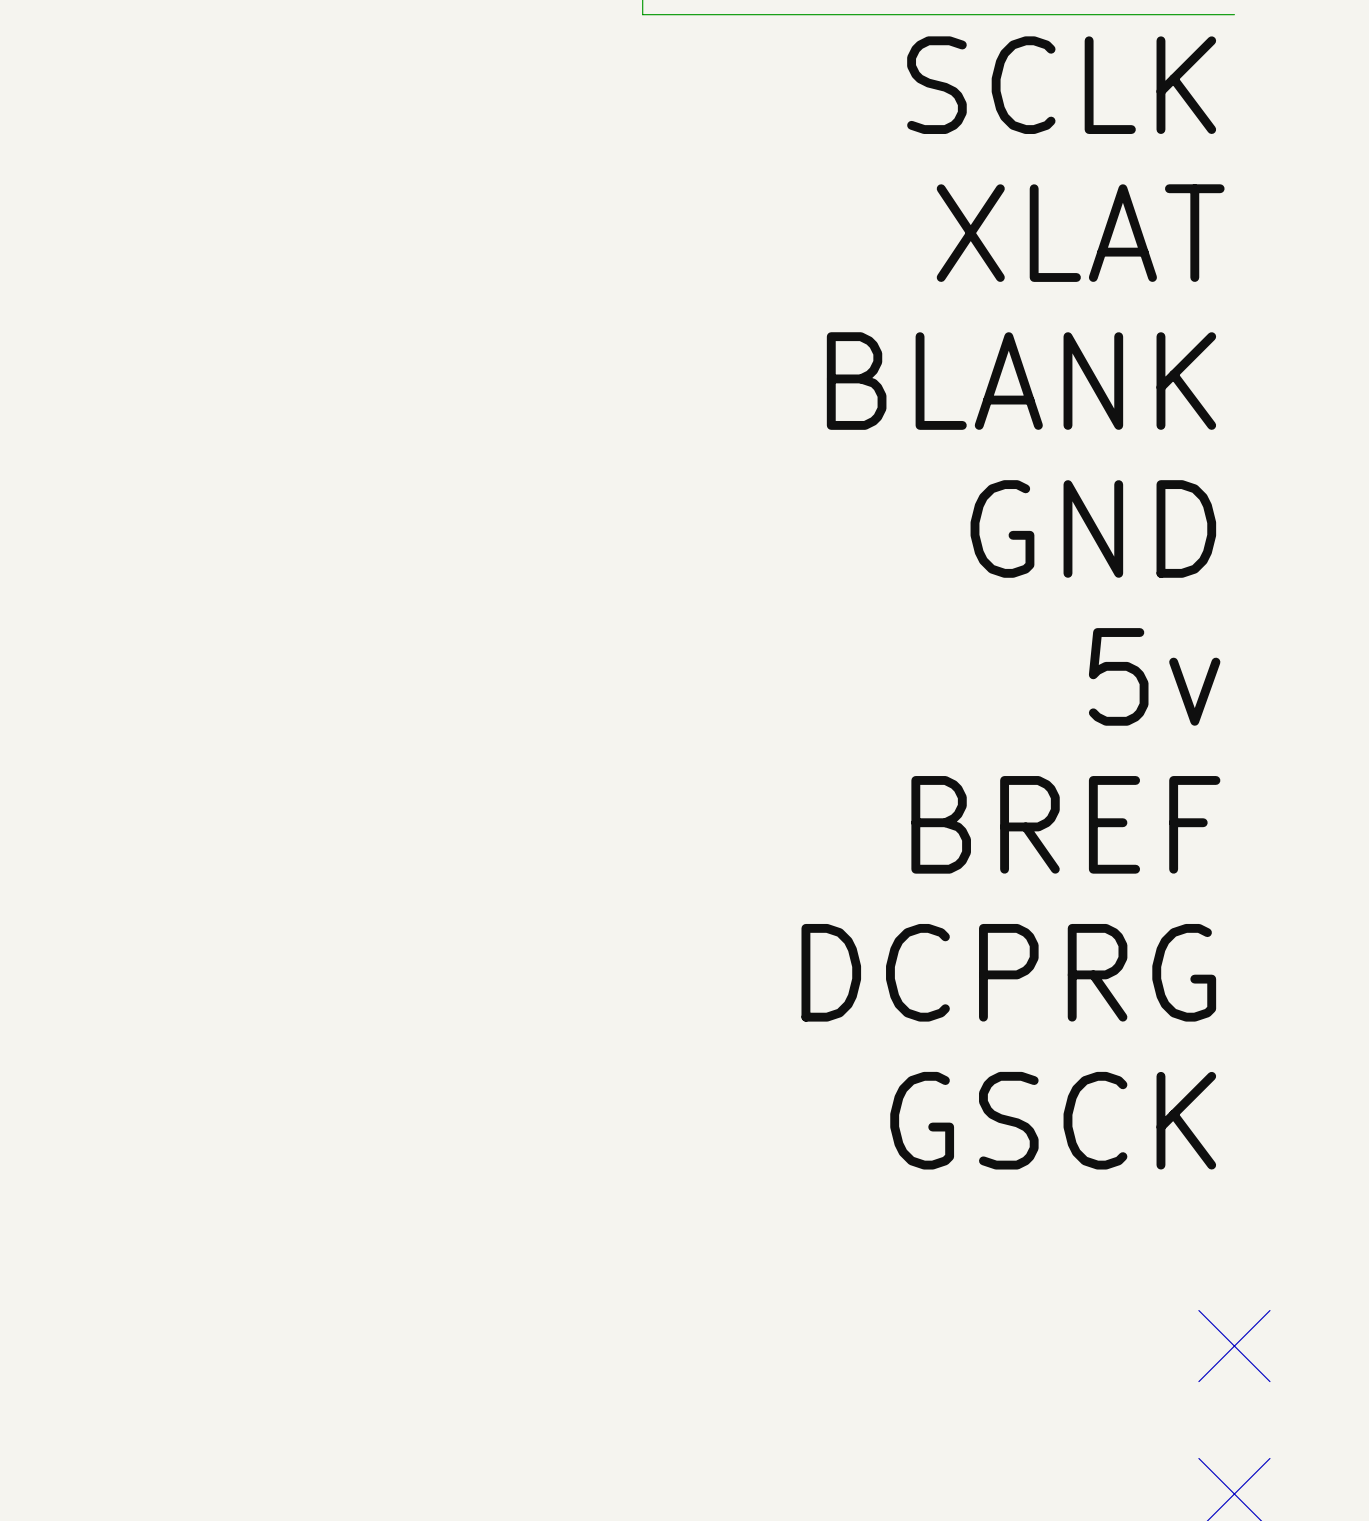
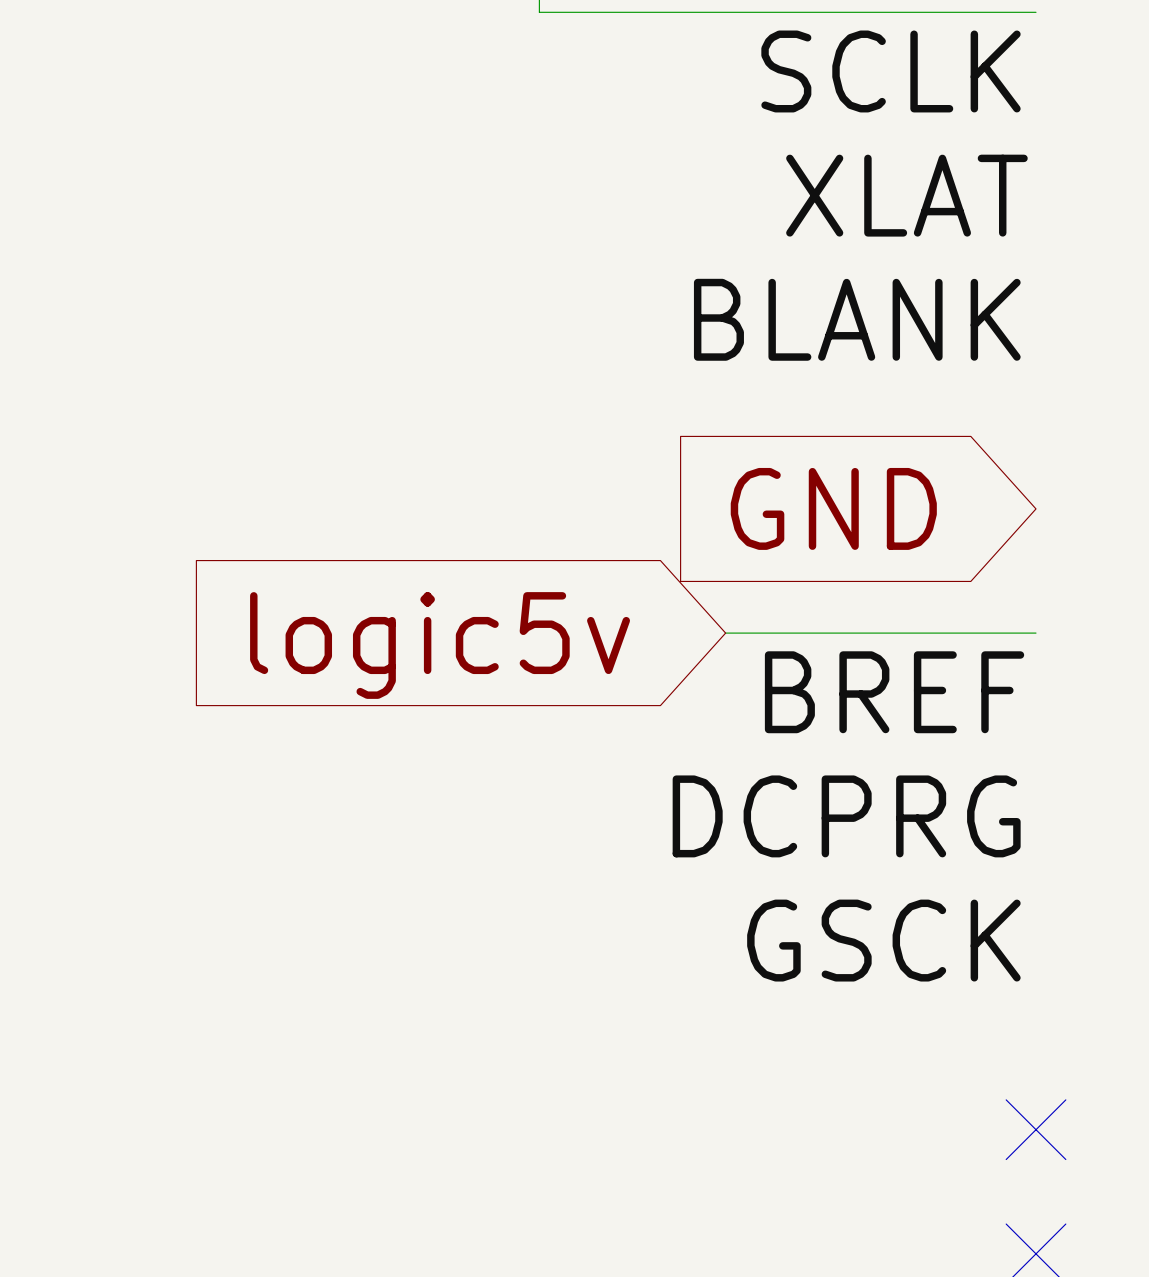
label: GND (1093, 528) -> none
global label: none -> GND (833, 508)
label: 5v (1154, 676) -> none
wire: none -> (725, 633) (1036, 633)
global label: none -> logic5v (440, 645)

